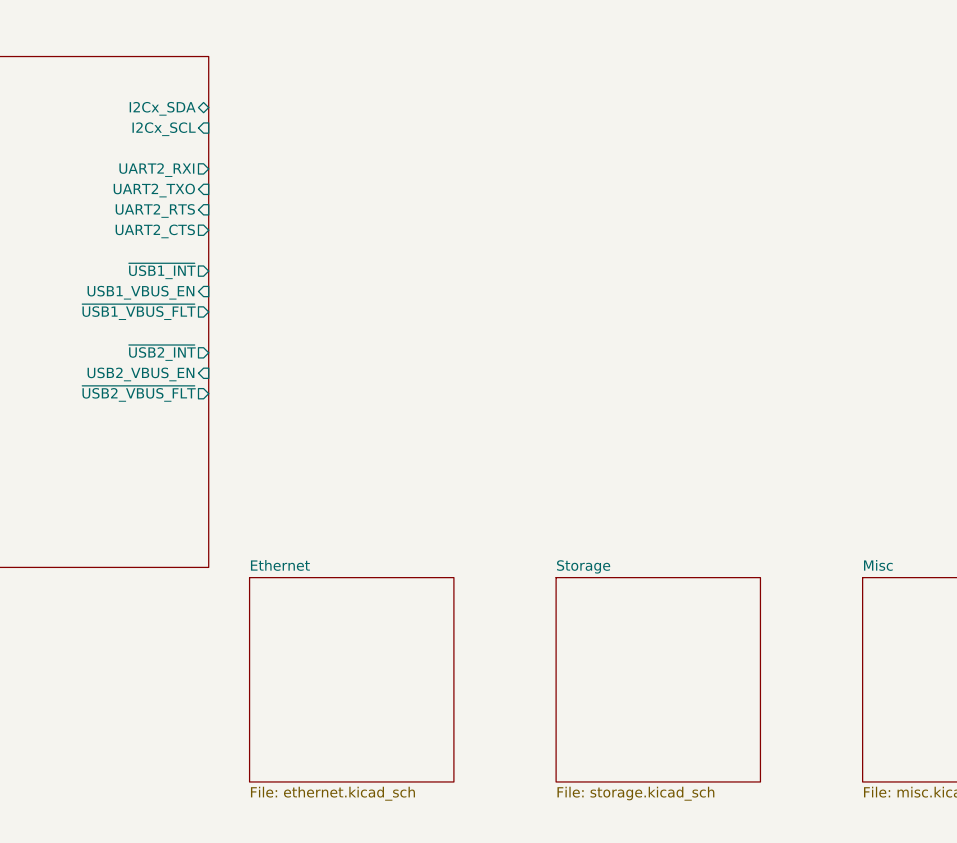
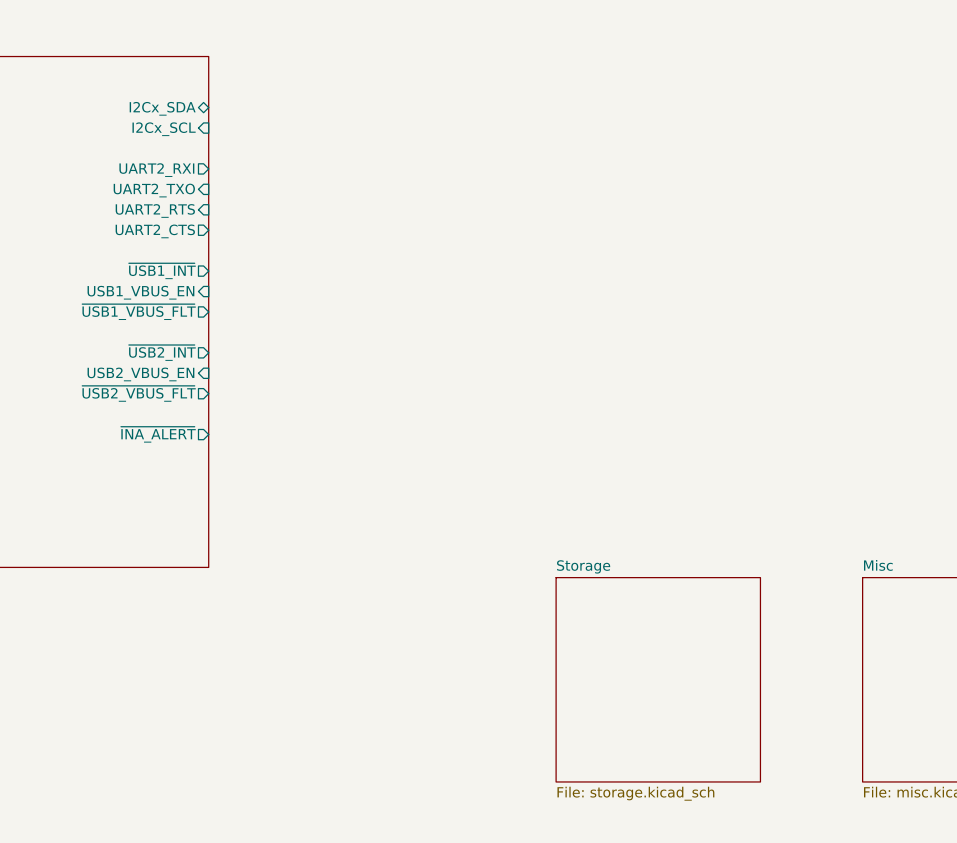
sheet pin: none -> ~{INA_ALERT} (158, 434)
sheet Ethernet: File: ethernet.kicad_sch (351, 679) -> none

